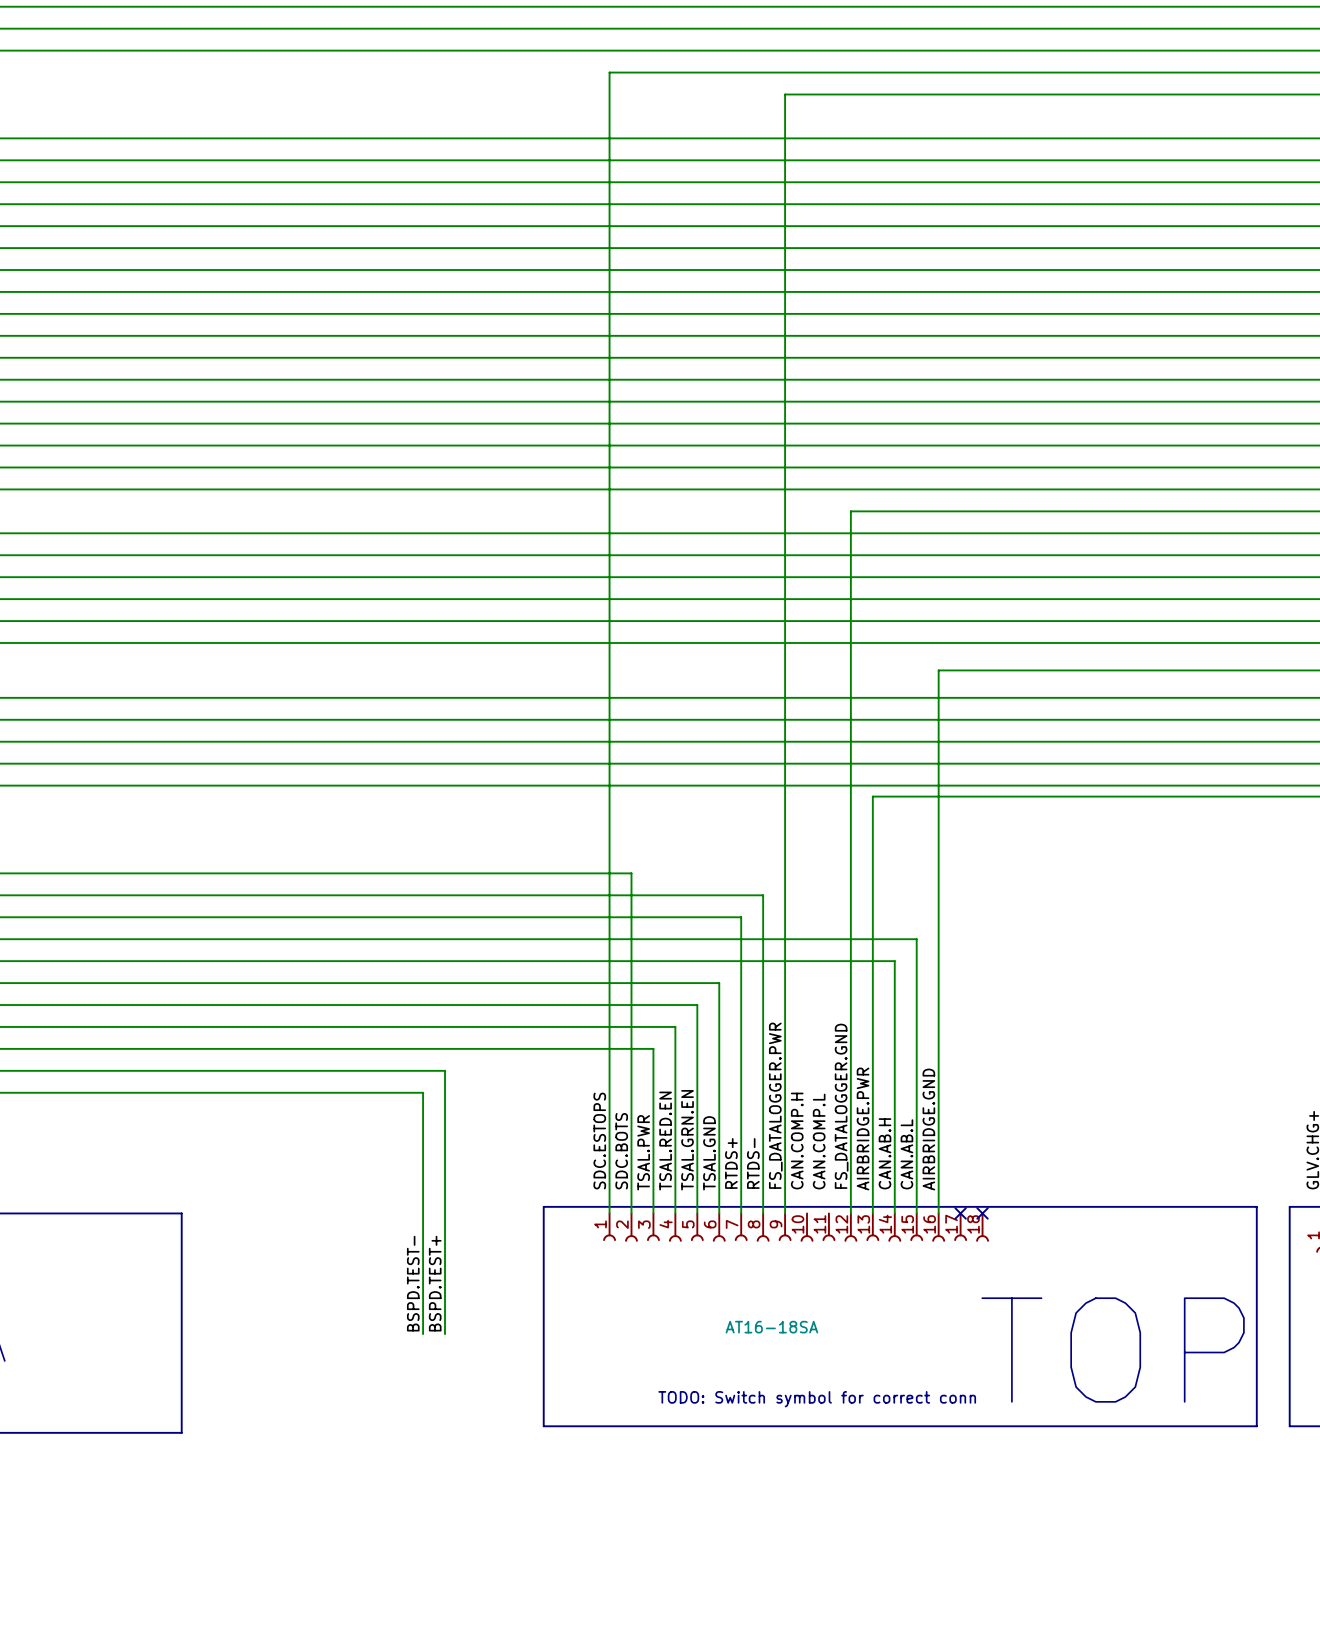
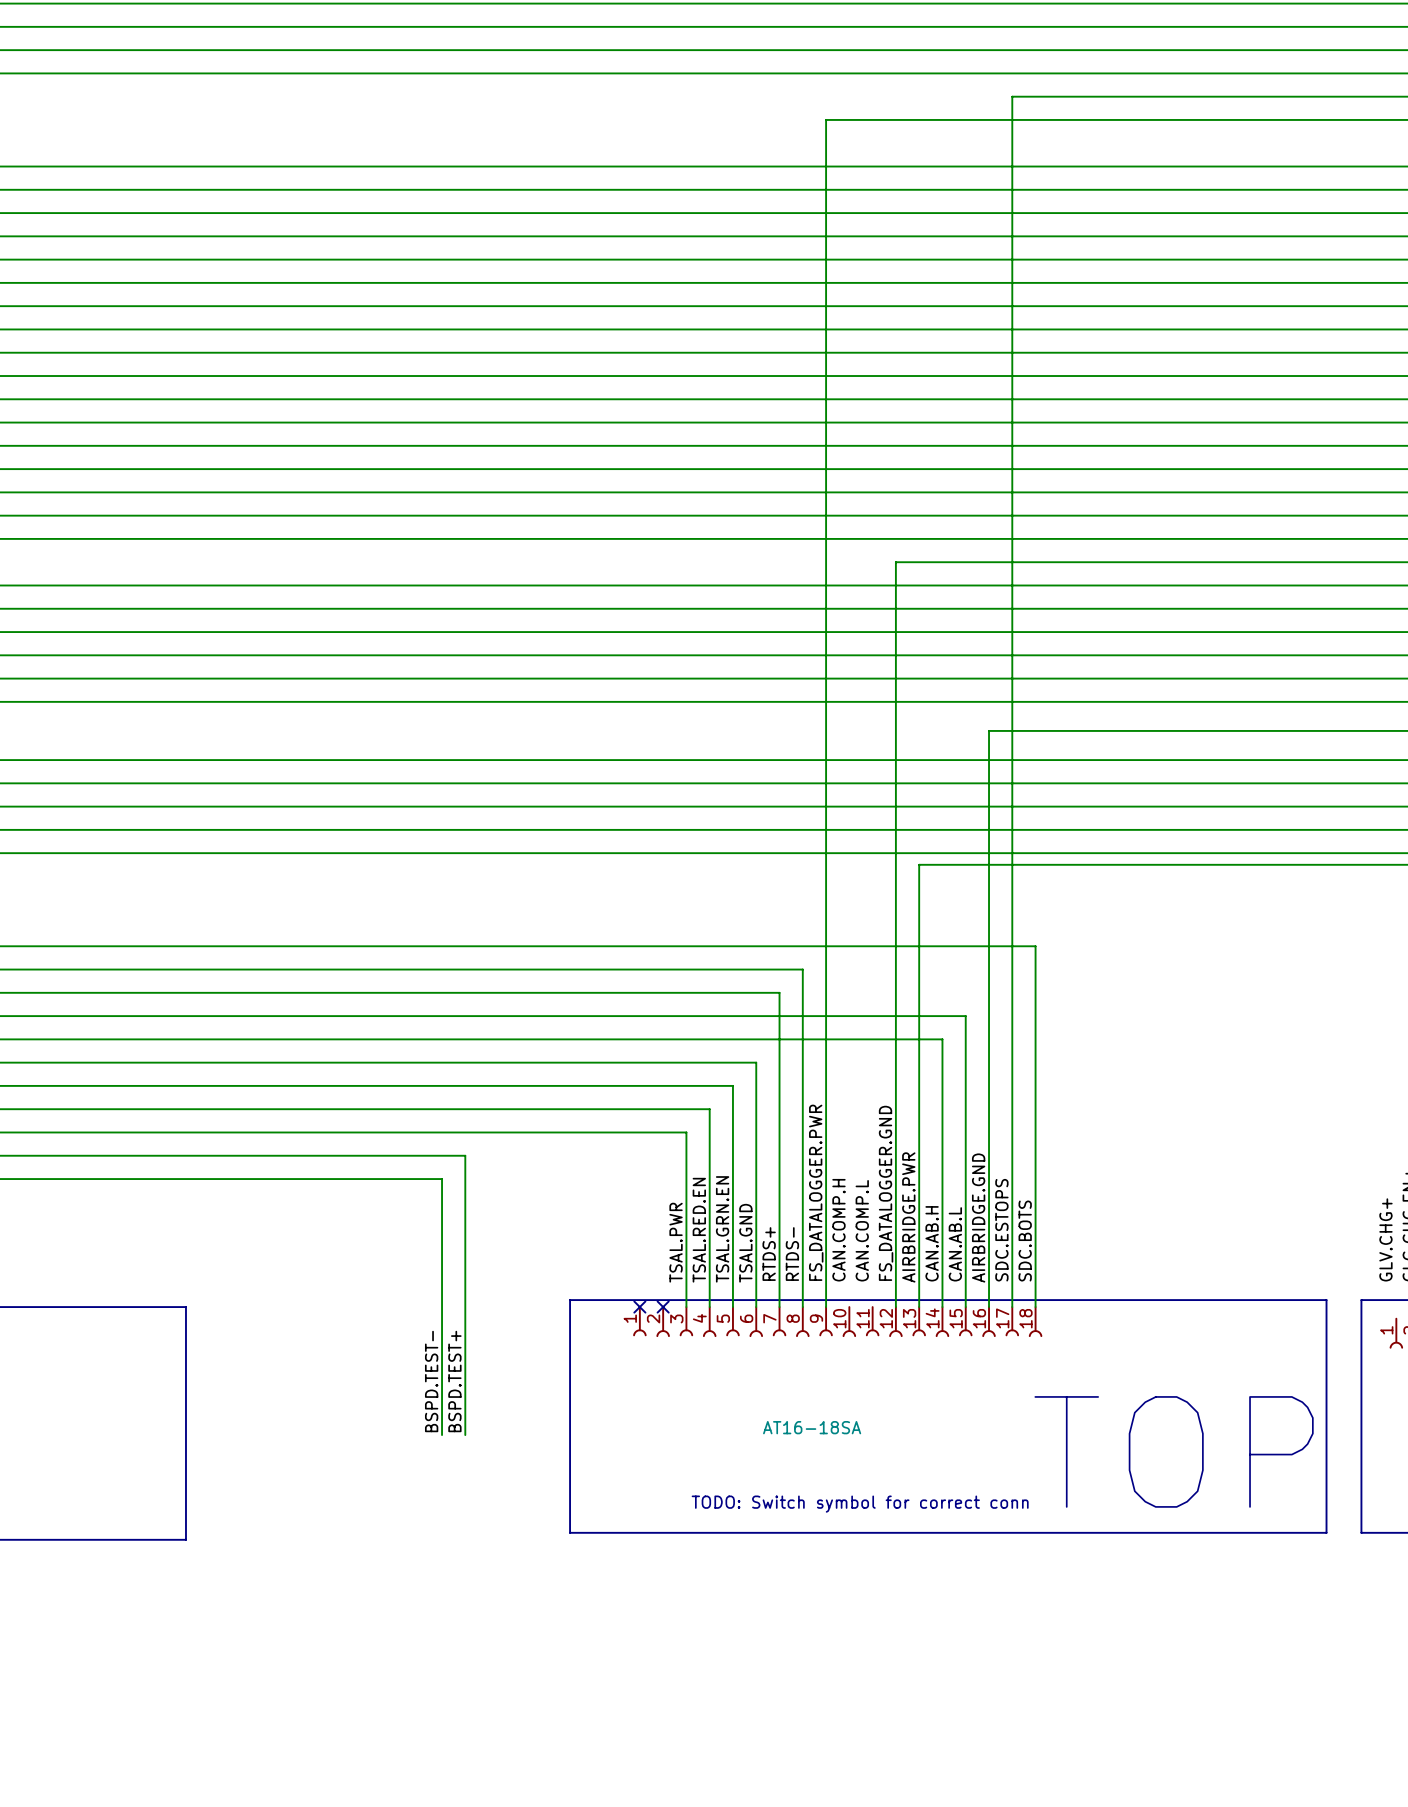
wire: (960, 72) (609, 72) (609, 1213) -> (1012, 96) (1012, 1307)
wire: (631, 873) (631, 1213) -> (663, 946) (1035, 946) (1035, 1307)
label: SDC.ESTOPS (599, 1141) -> none
label: none -> SDC.ESTOPS (1001, 1230)
label: SDC.BOTS (621, 1151) -> none
label: none -> SDC.BOTS (1025, 1241)
no-connect mark: none -> (639, 1307)
no-connect mark: none -> (663, 1307)
no-connect mark: (960, 1213) -> none
no-connect mark: (982, 1213) -> none

